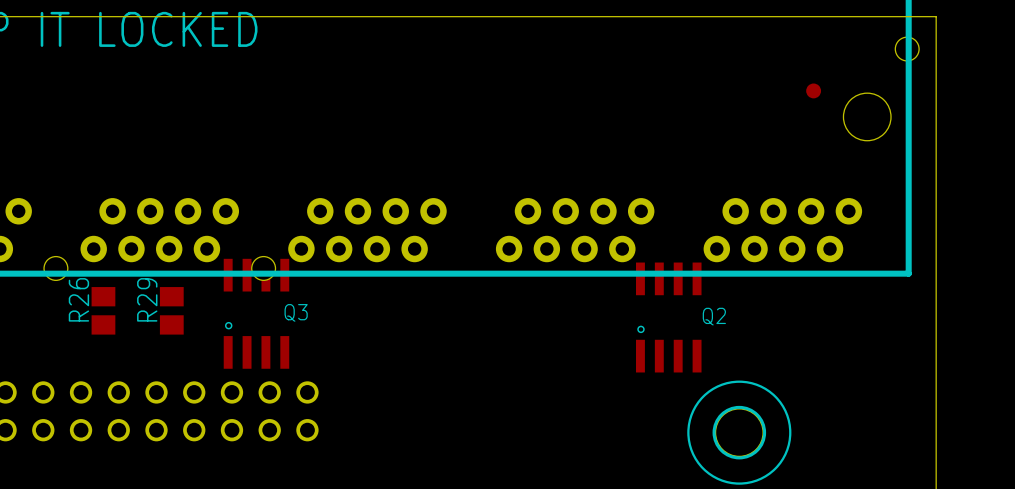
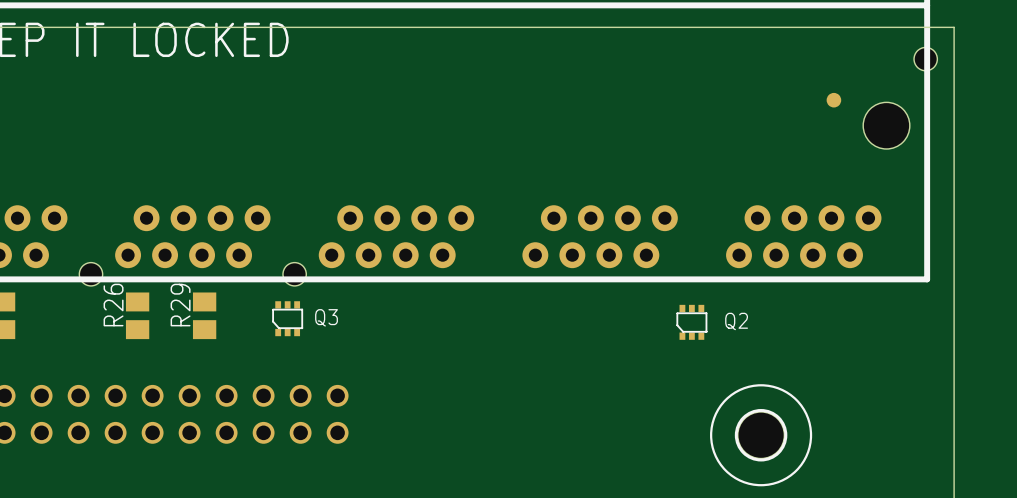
Q3 footprint: [223, 258, 290, 369] -> [272, 301, 304, 337]
Q2 footprint: [636, 262, 702, 373] -> [676, 304, 708, 340]

